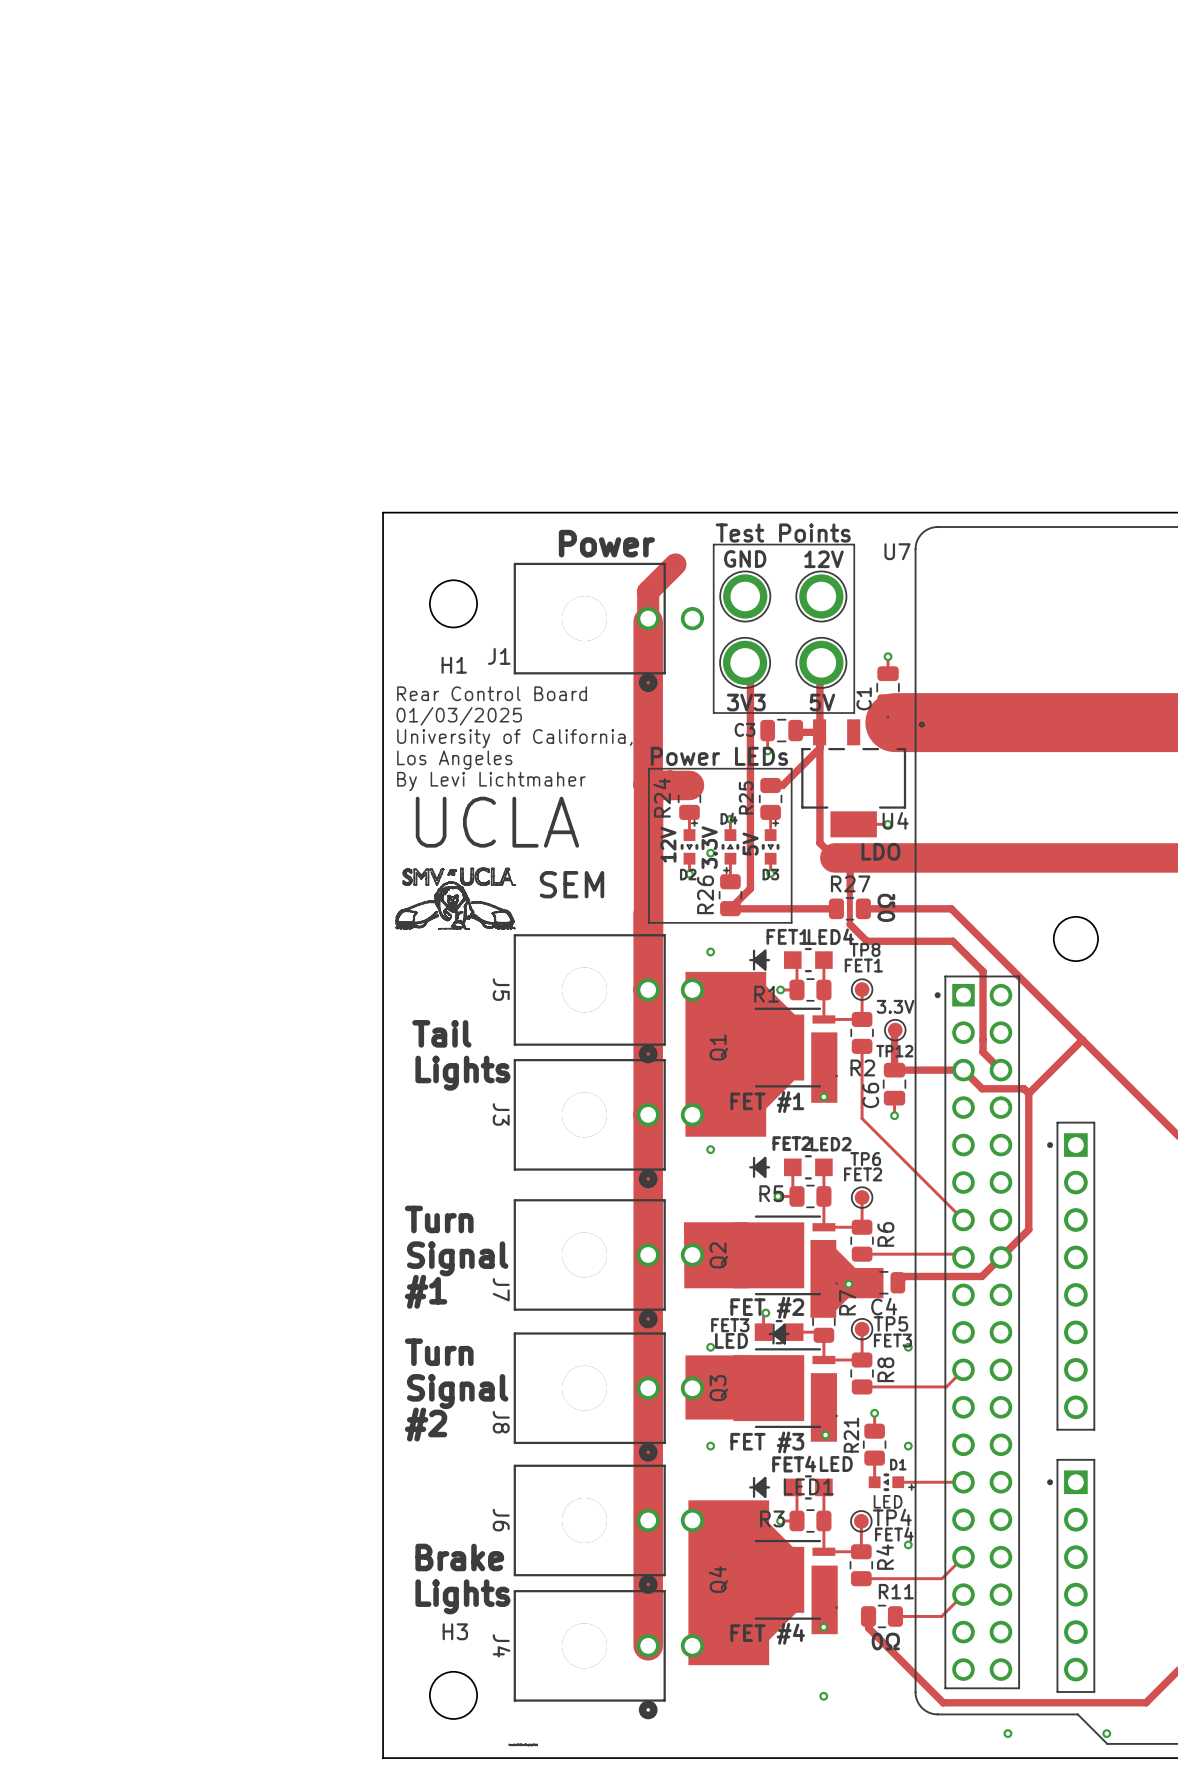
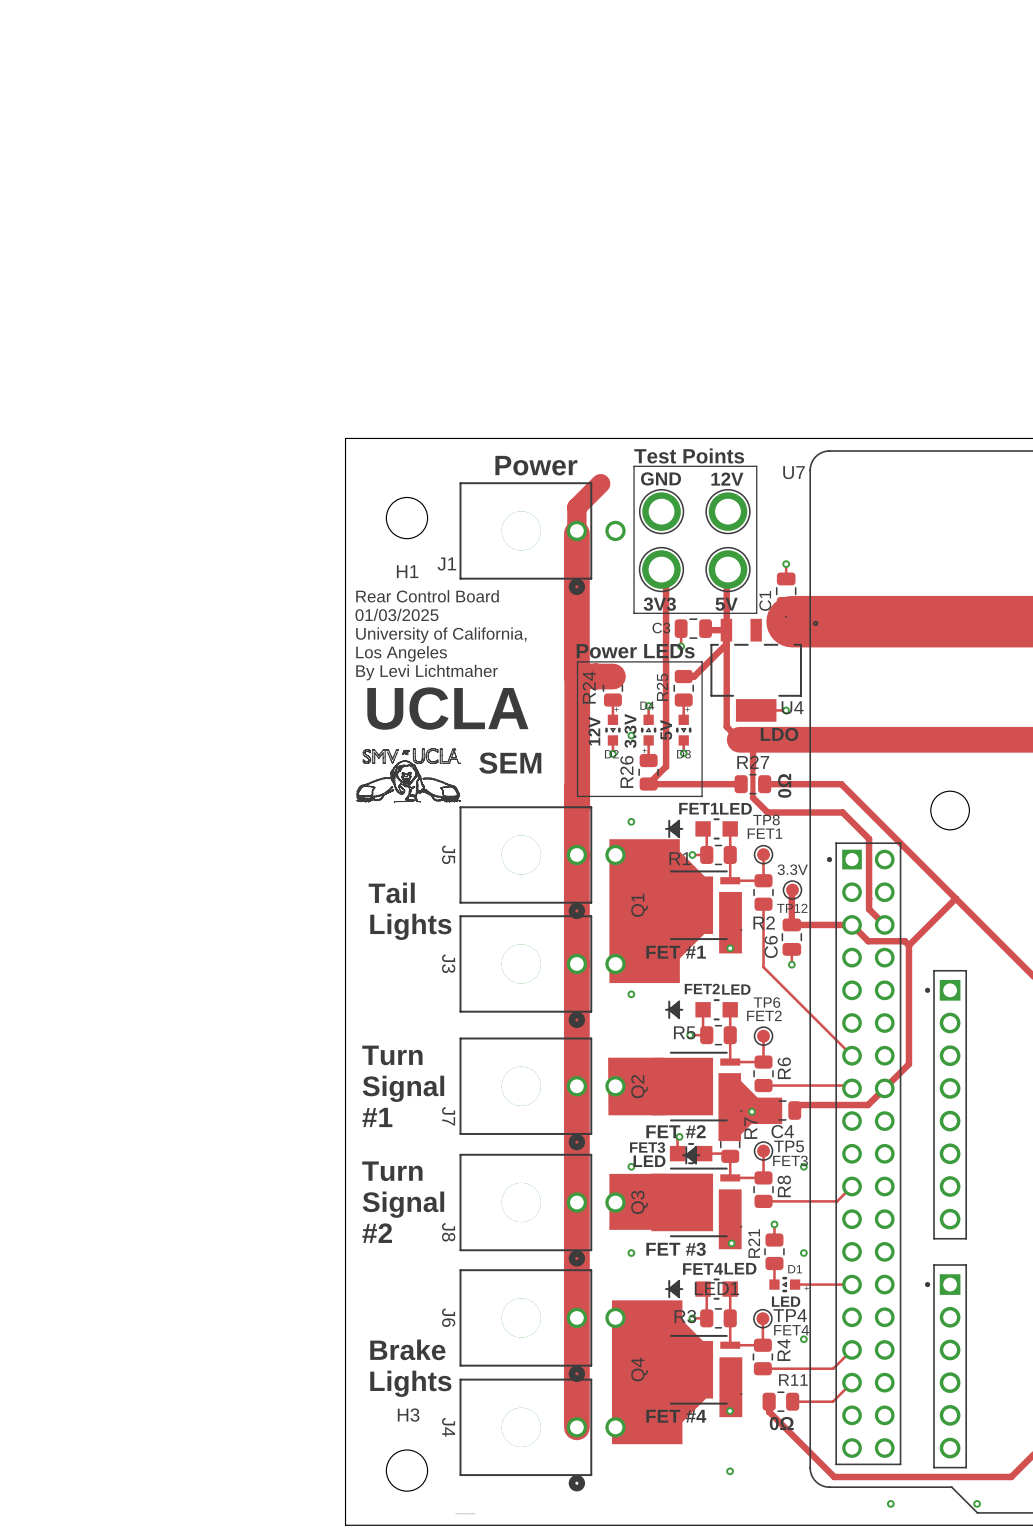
LED4 name: LED4 (830, 936) -> LED (735, 808)
LED2 name: LED2 (831, 1144) -> LED (736, 989)

